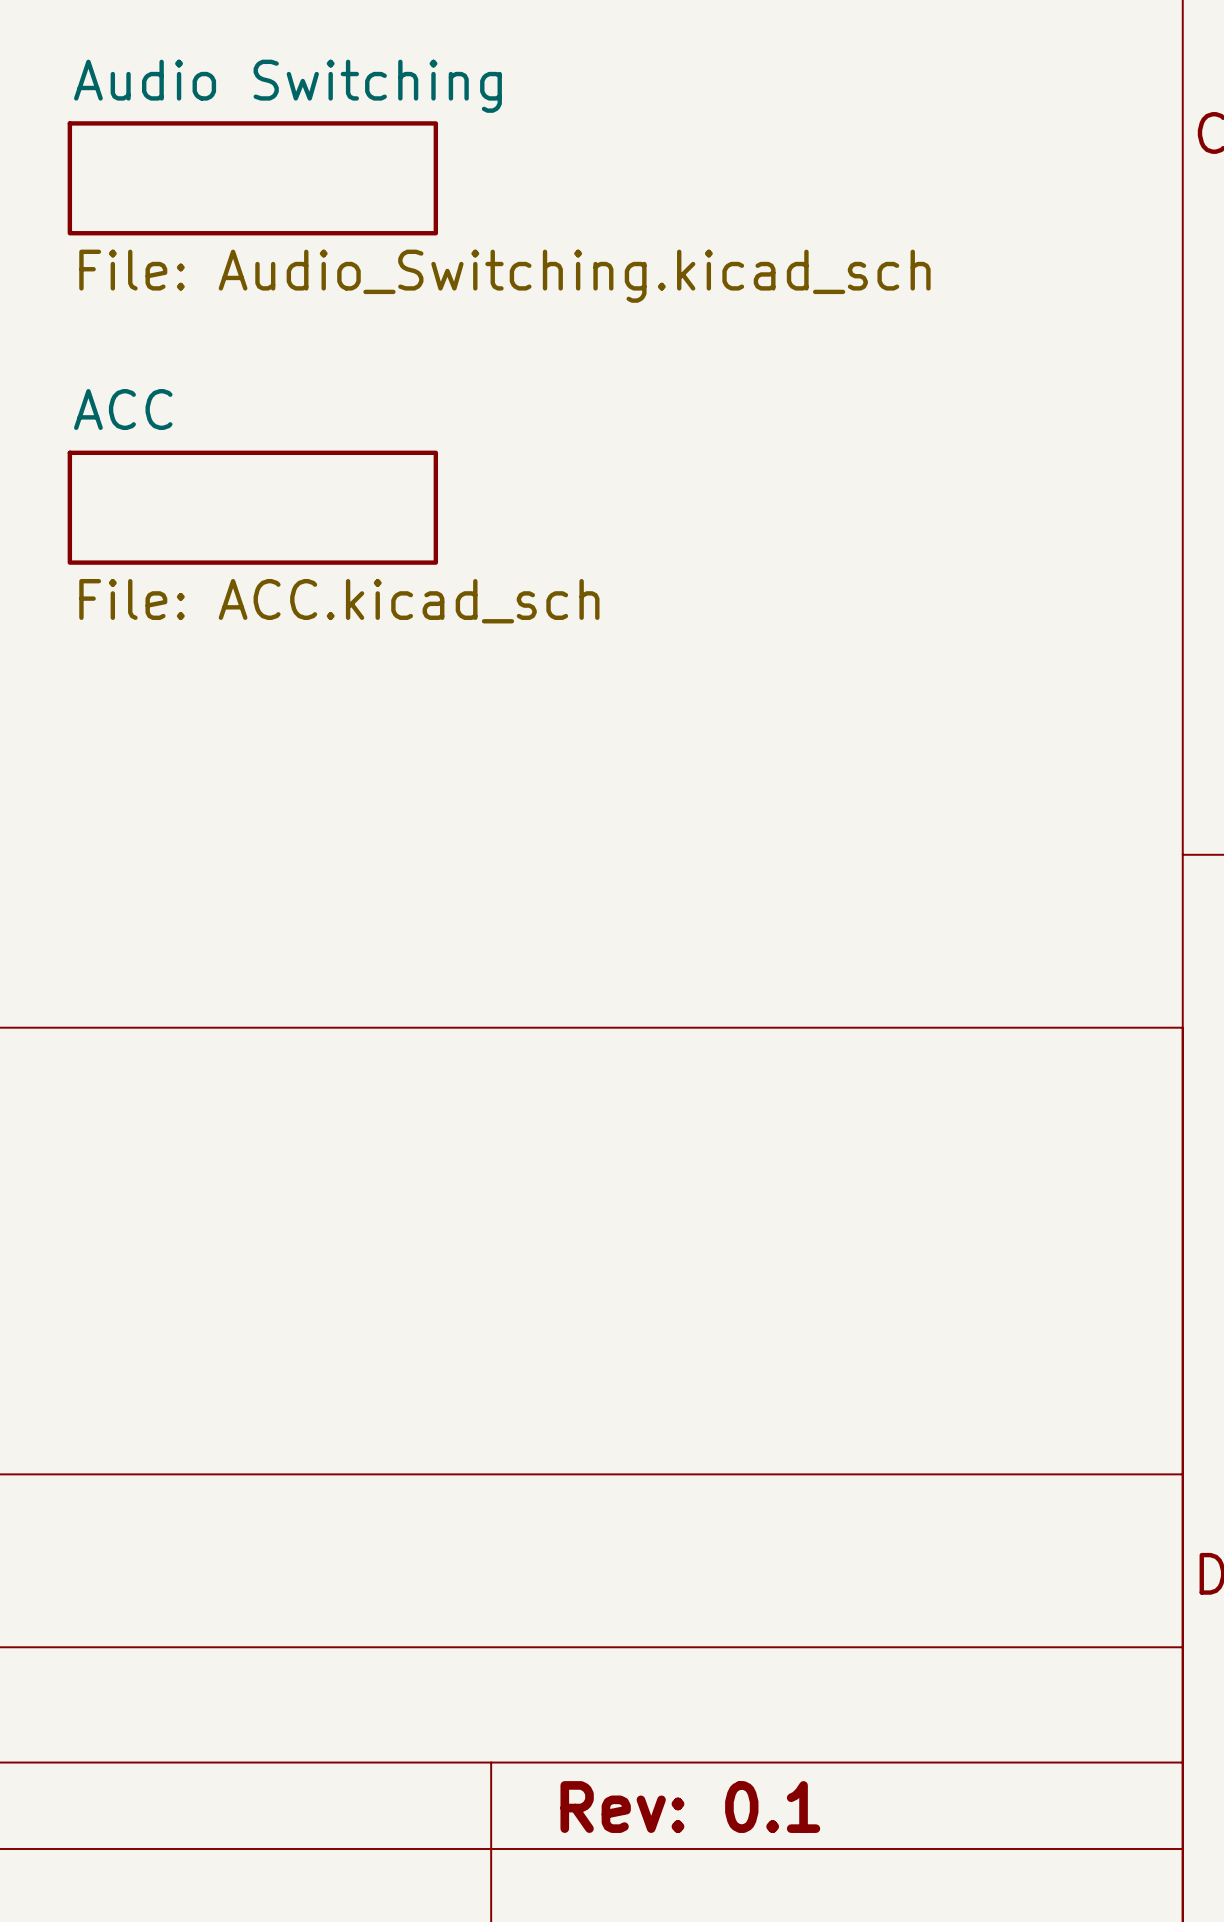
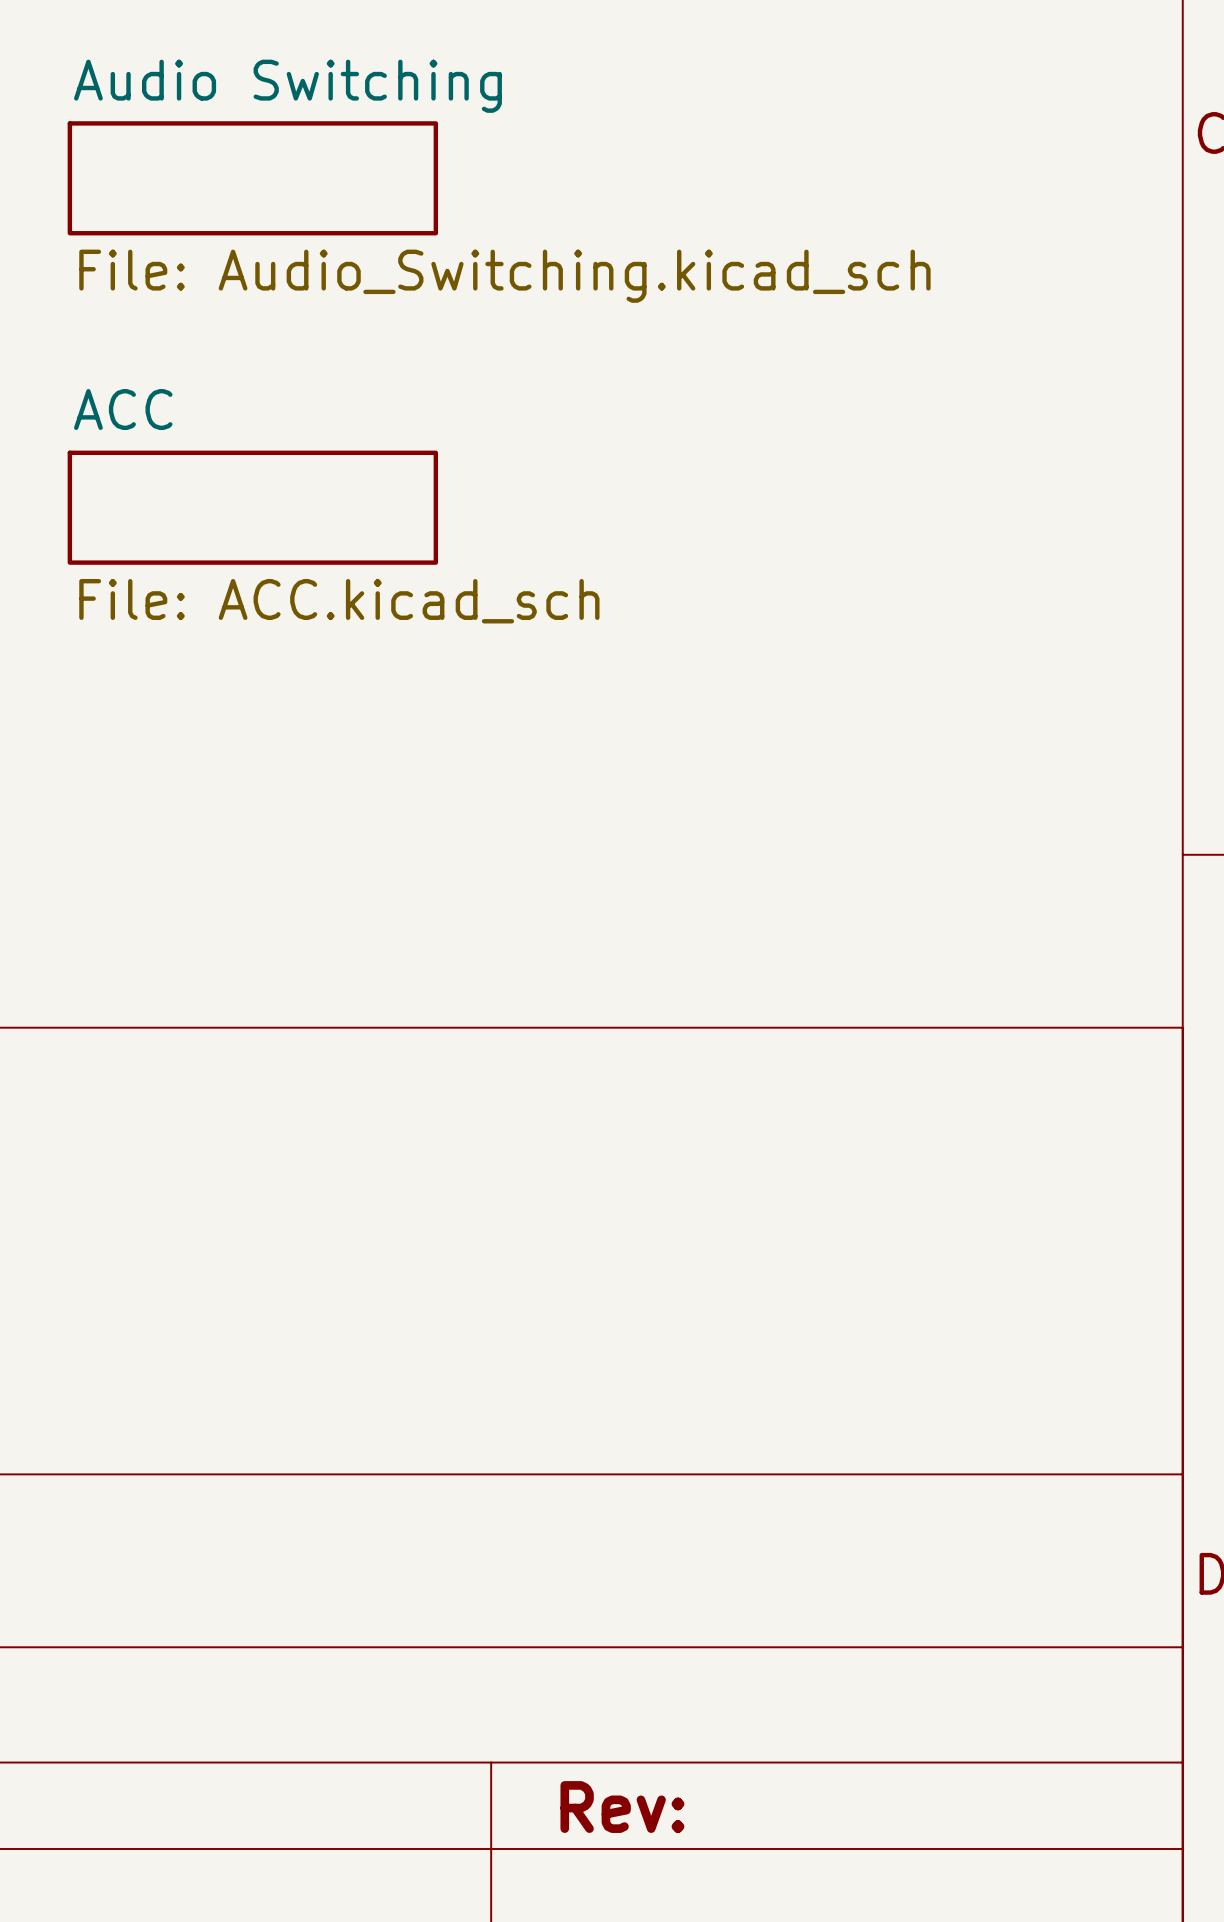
title block: Rev: 0.1 (690, 1807) -> Rev: (622, 1807)

